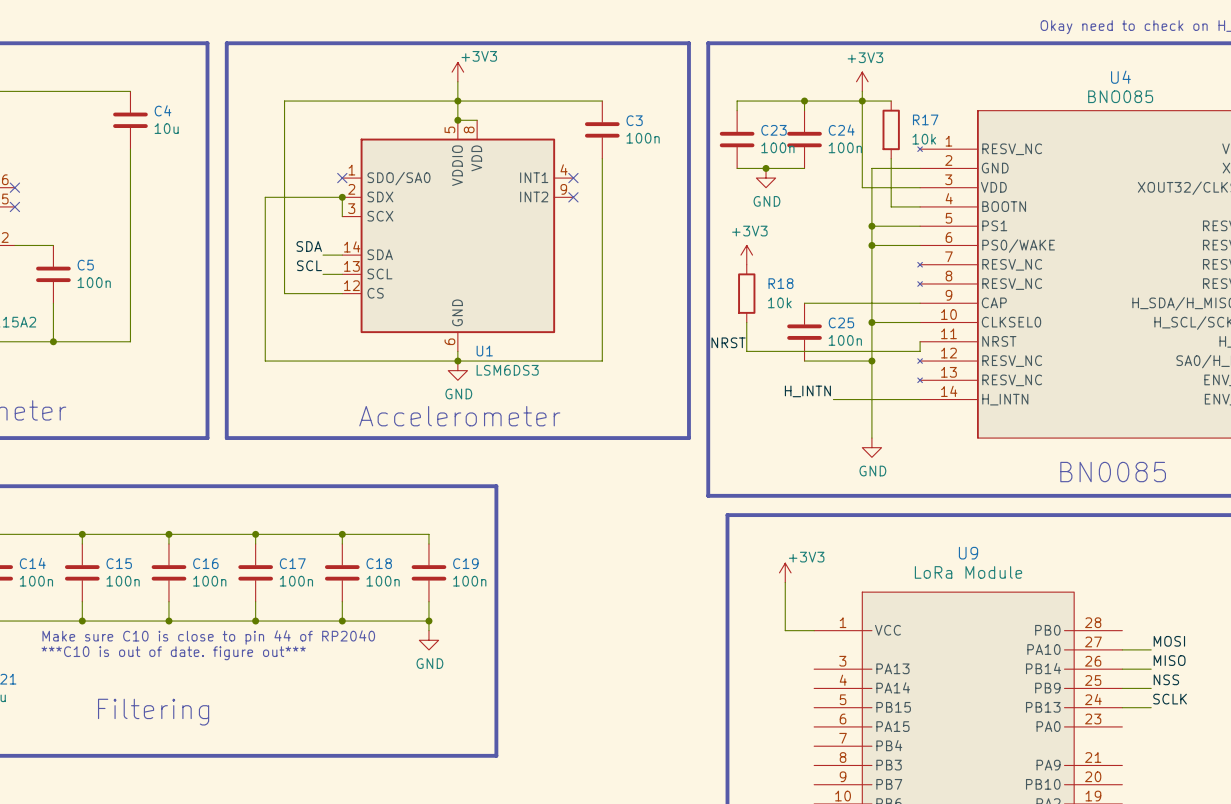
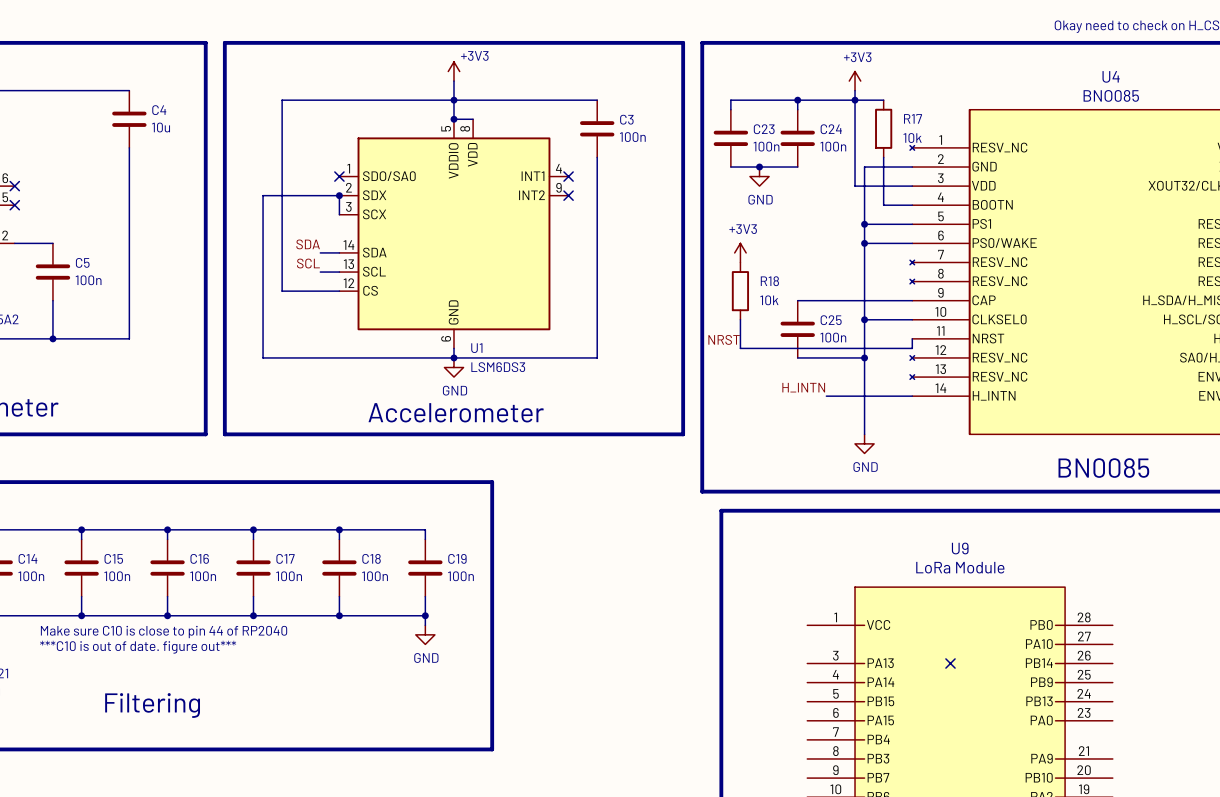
power symbol: +3V3 (785, 572) -> none
wire: (785, 582) (785, 630) (814, 630) -> none
label: MOSI (1169, 641) -> none
wire: (1122, 649) (1151, 649) -> none
label: MISO (1169, 660) -> none
no-connect mark: none -> (950, 663)
wire: (1122, 669) (1151, 669) -> none
label: NSS (1166, 679) -> none
wire: (1122, 688) (1151, 688) -> none
label: SCLK (1170, 699) -> none
wire: (1122, 707) (1151, 707) -> none

